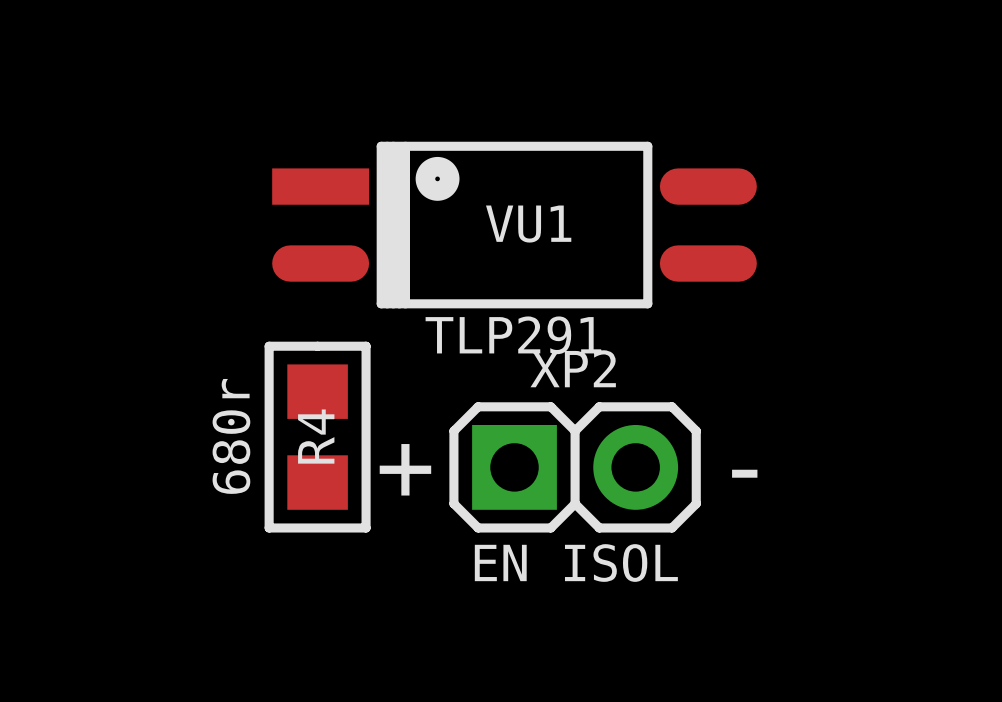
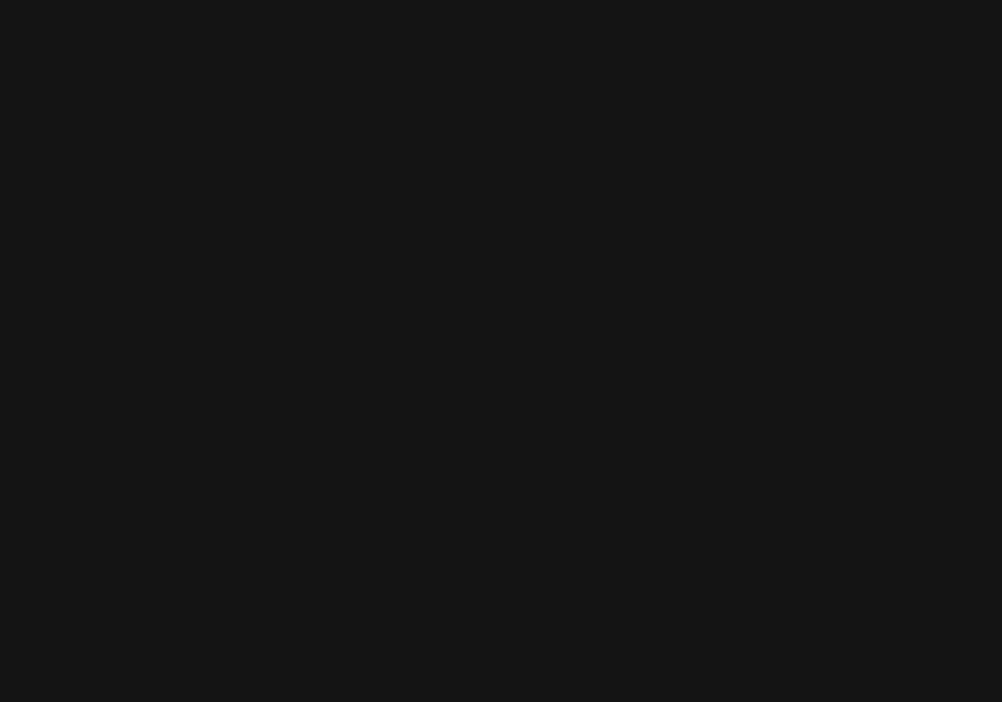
VU1: TLP291 (514, 225) -> none
R4: 680r (317, 437) -> none
XP2: EN ISOL (575, 467) -> none

